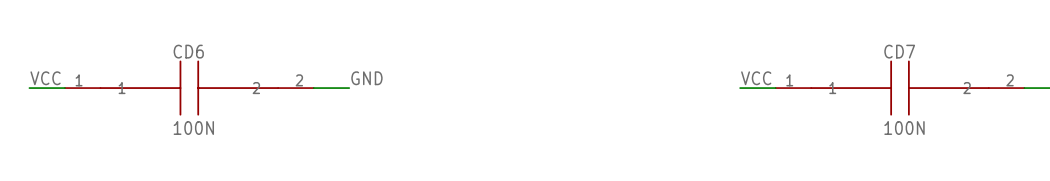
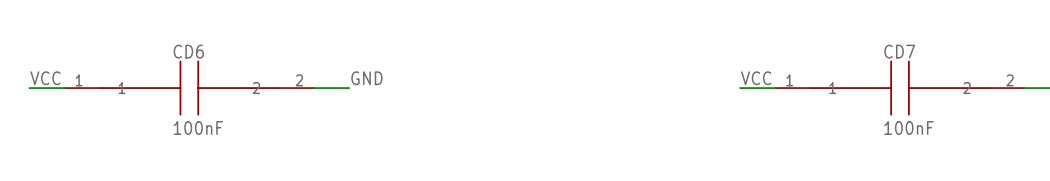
CD6 value: 100N (193, 128) -> 100nF (198, 128)
CD7 value: 100N (904, 128) -> 100nF (909, 128)

